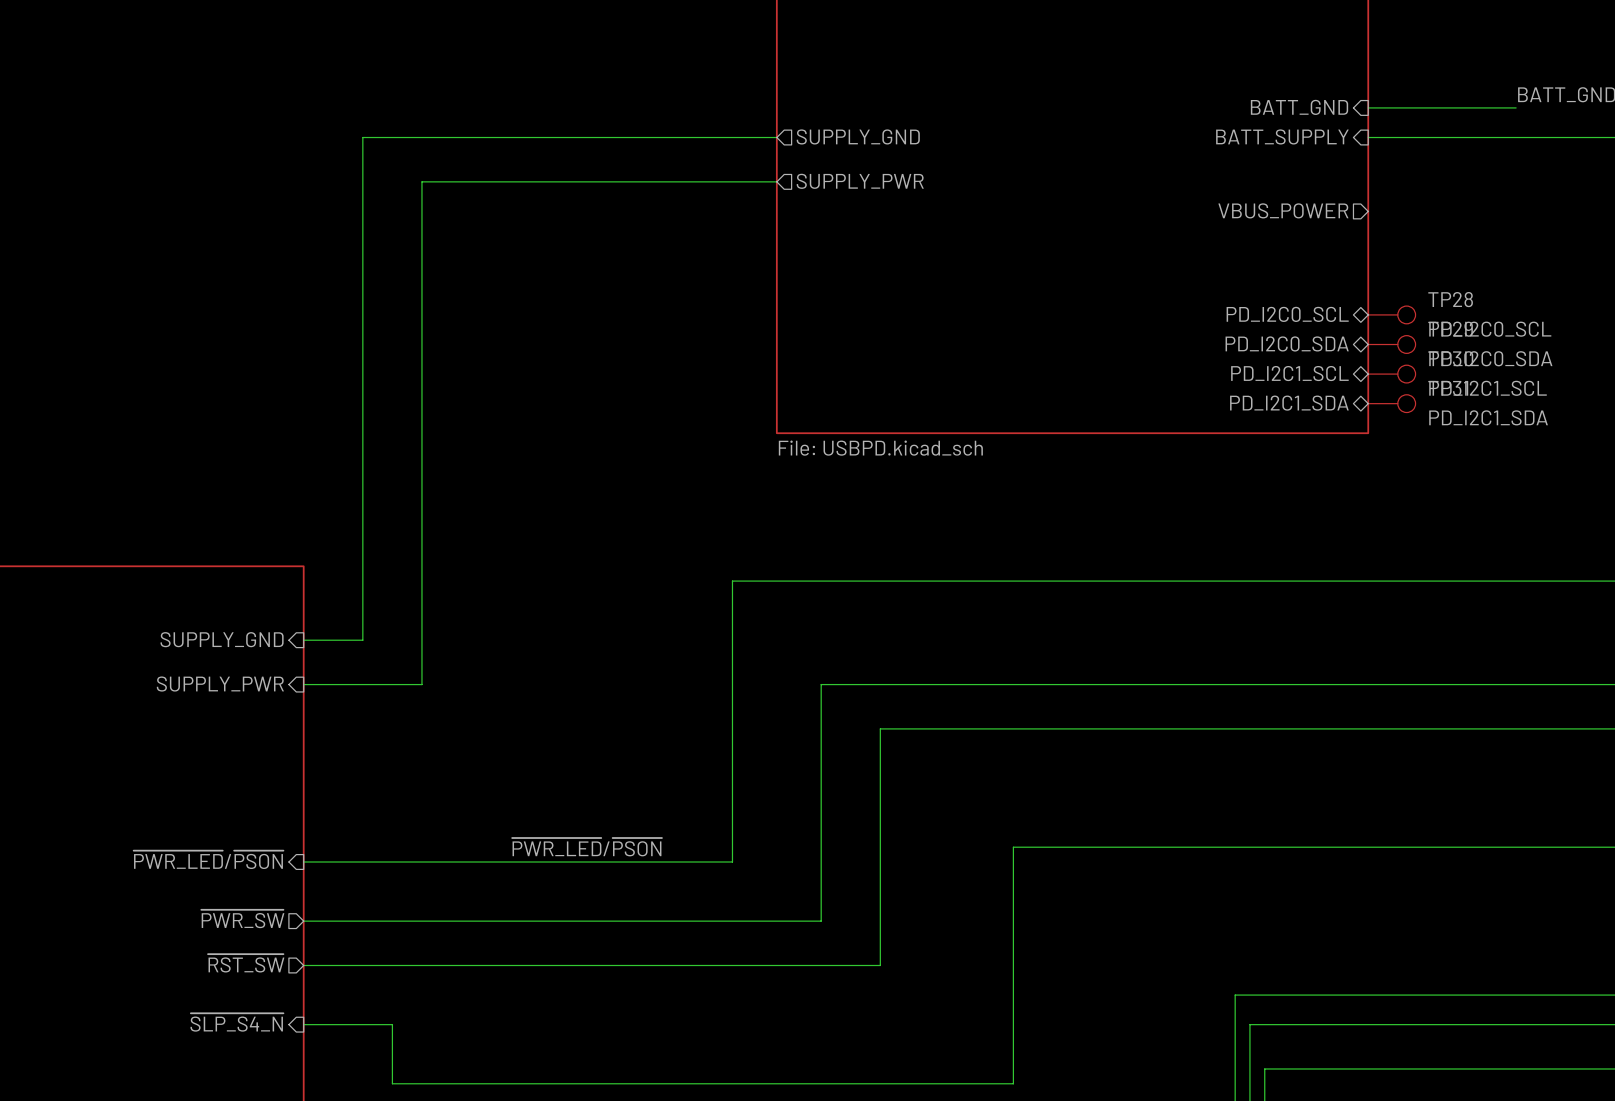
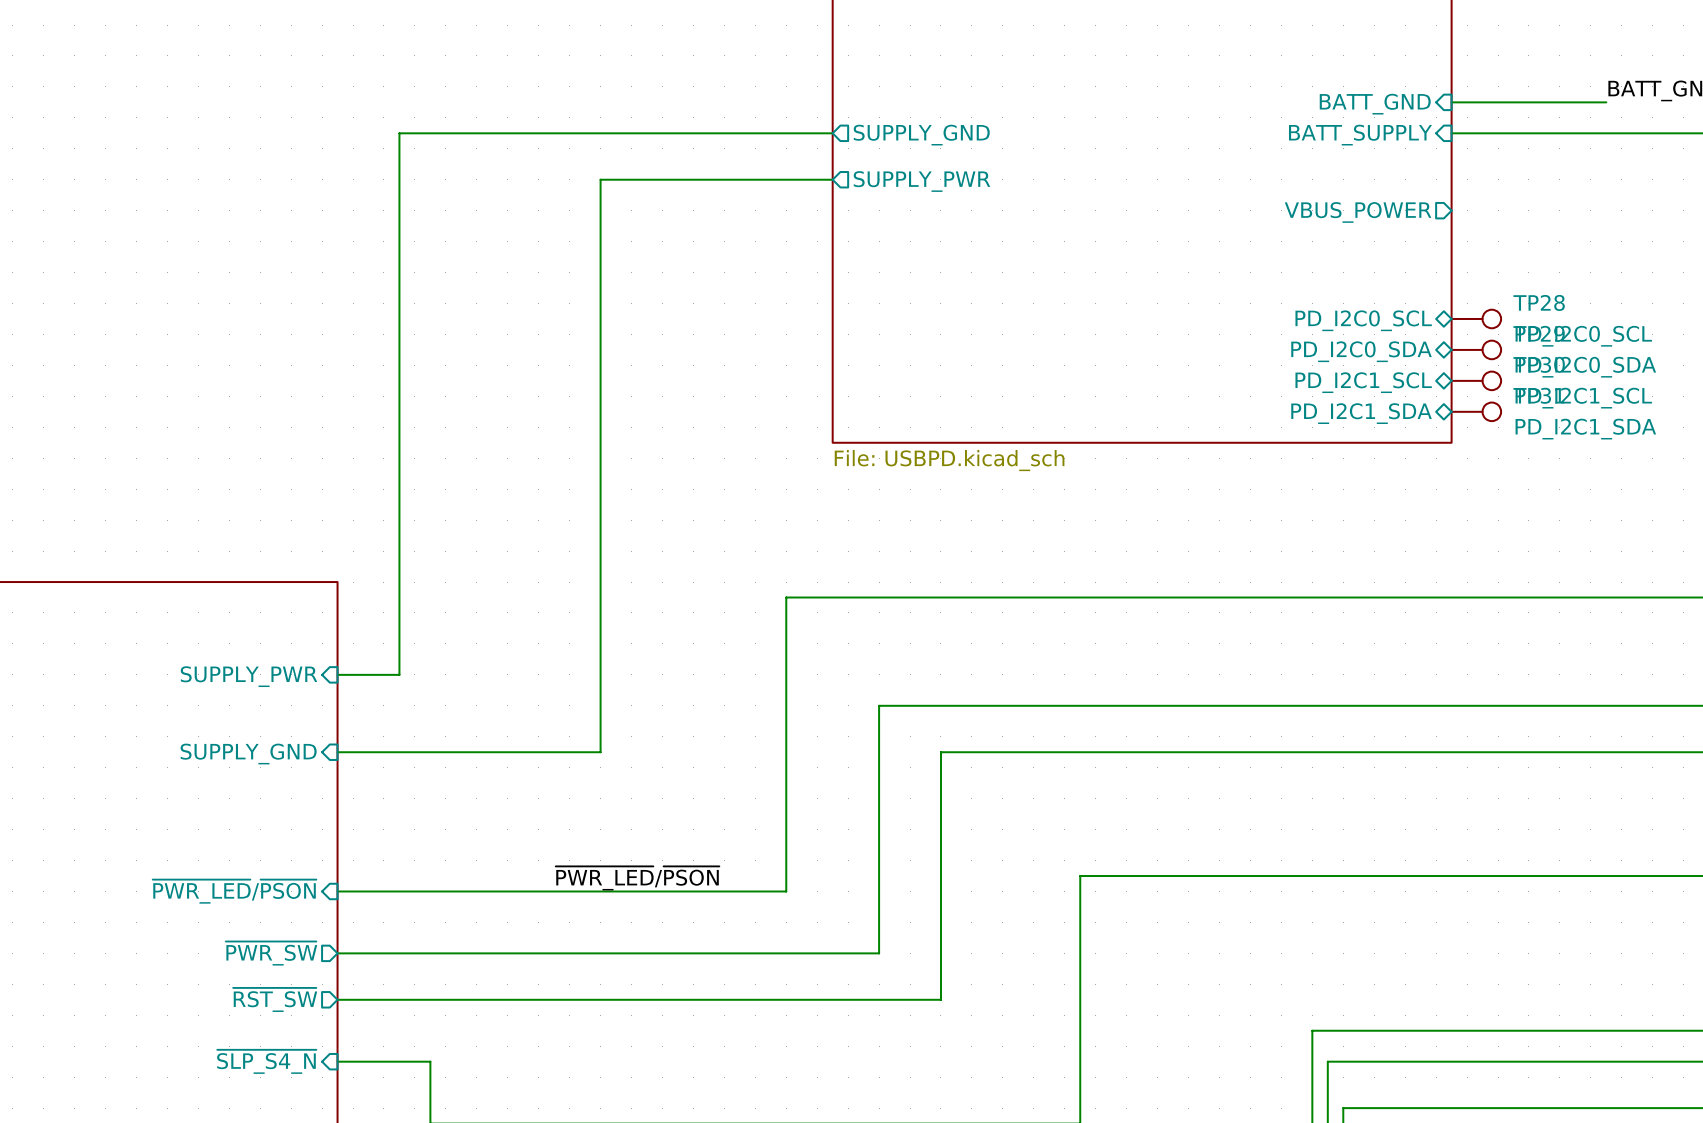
wire: (555, 181) (421, 181) (421, 684) (303, 684) -> (600, 179) (600, 752) (337, 752)
sheet pin position: SUPPLY_GND (222, 639) -> SUPPLY_GND (248, 754)
wire: (303, 640) (362, 640) -> (337, 674) (399, 674) (399, 659)
sheet pin position: SUPPLY_PWR (220, 684) -> SUPPLY_PWR (249, 676)

